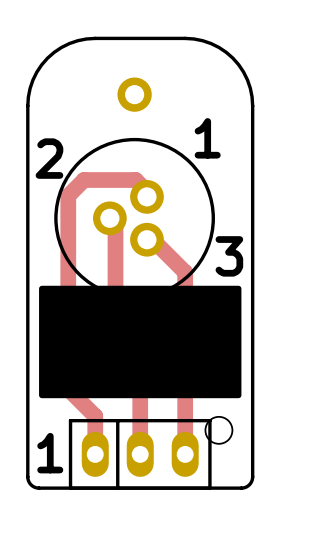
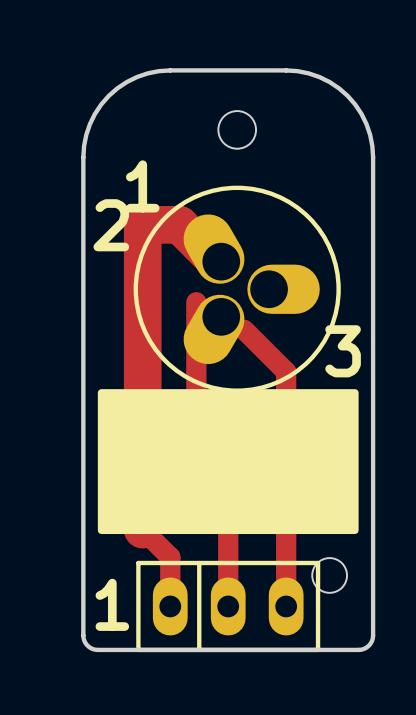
part footprint: [54, 77, 215, 299] -> [133, 111, 341, 393]
text position: 1 (207, 138) -> 1 (142, 186)
top track: (152, 196) (135, 180) (84, 180) (68, 195) (68, 389) (73, 394) -> (221, 261) (216, 261) (179, 224) (142, 224) (142, 529)

